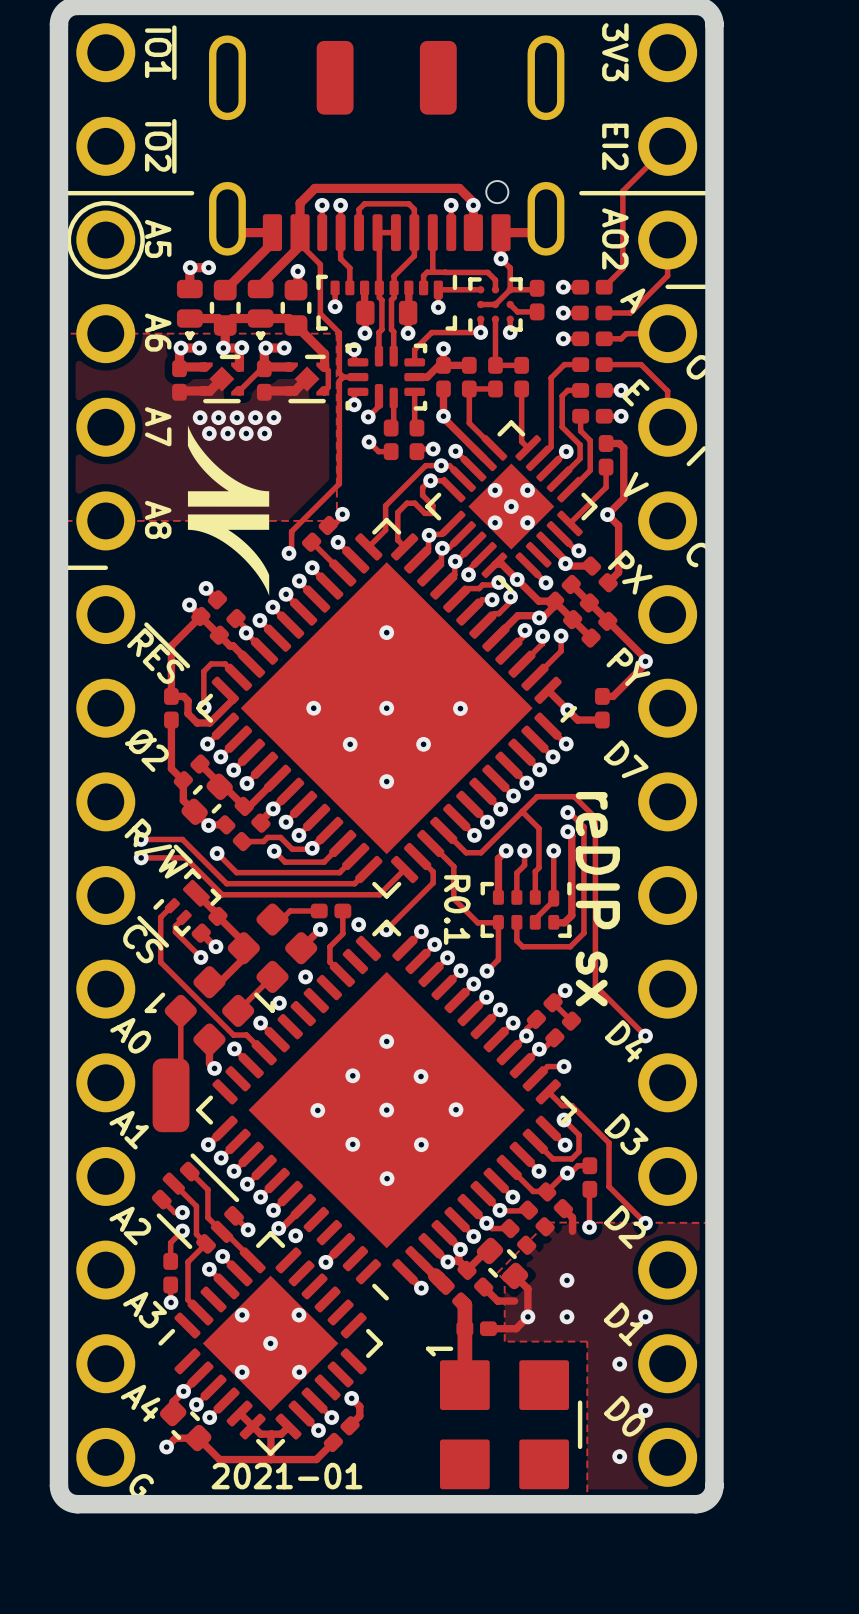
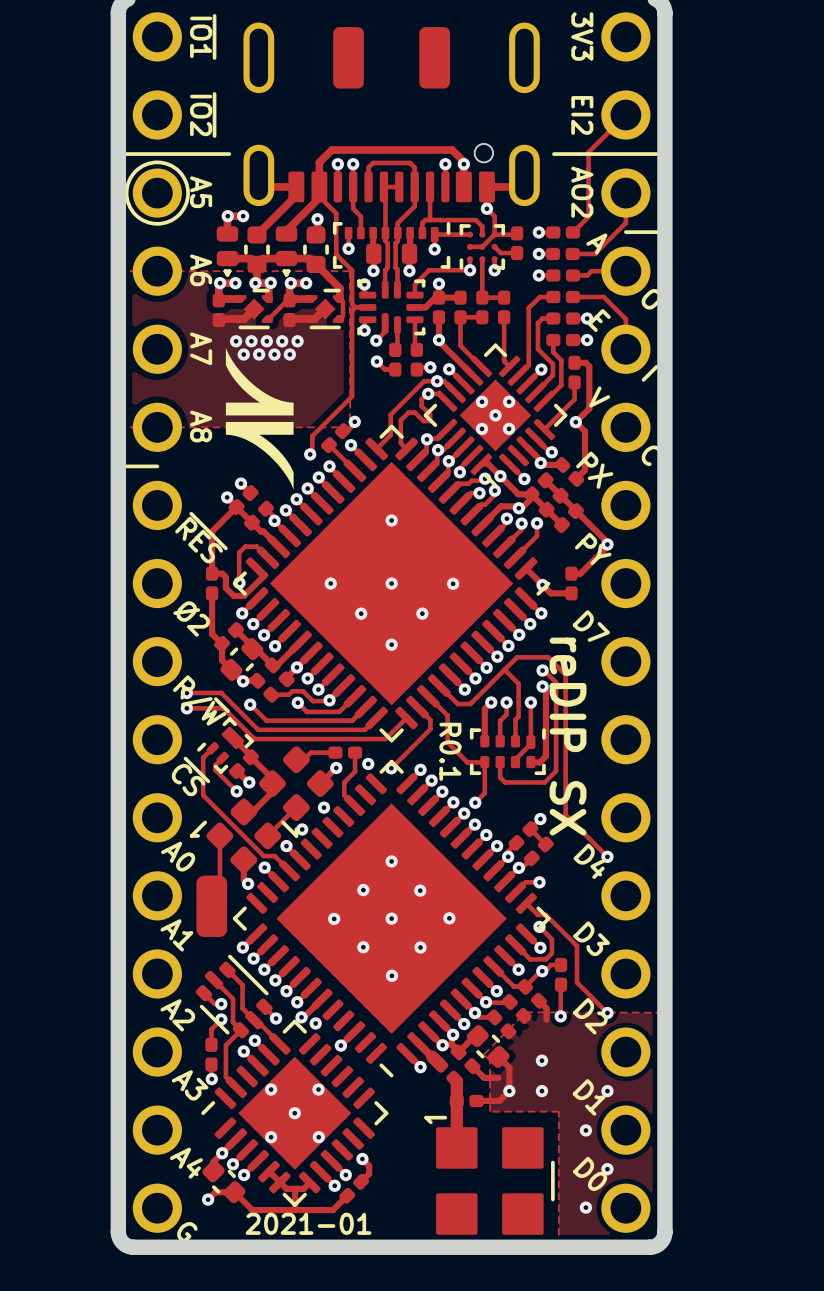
text: reDIP (597, 860) -> reDIP SX (568, 736)
text: sx (591, 978) -> none

